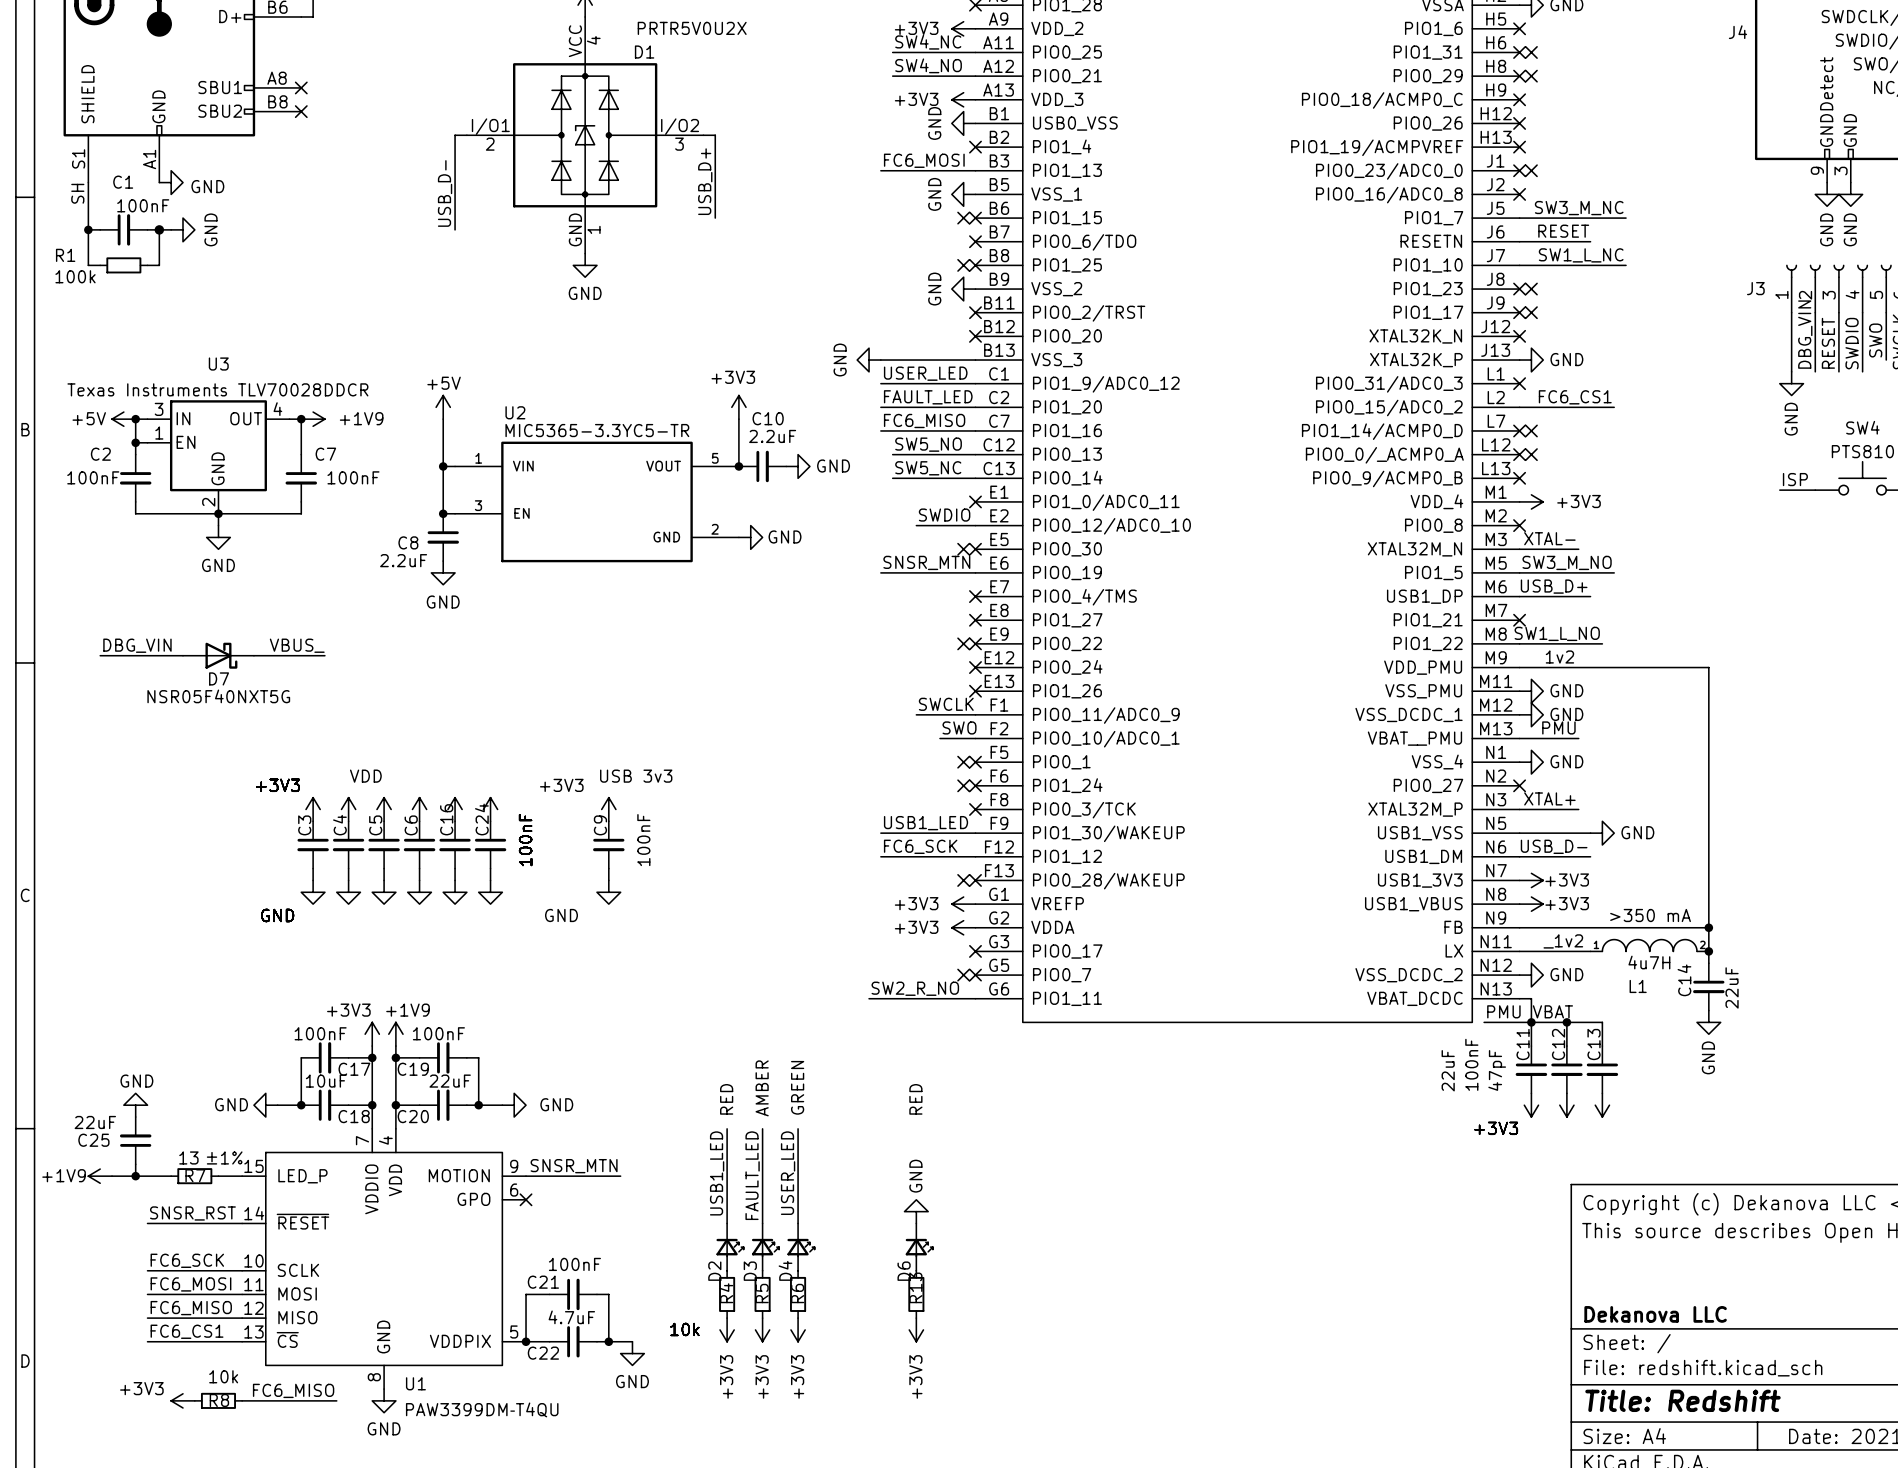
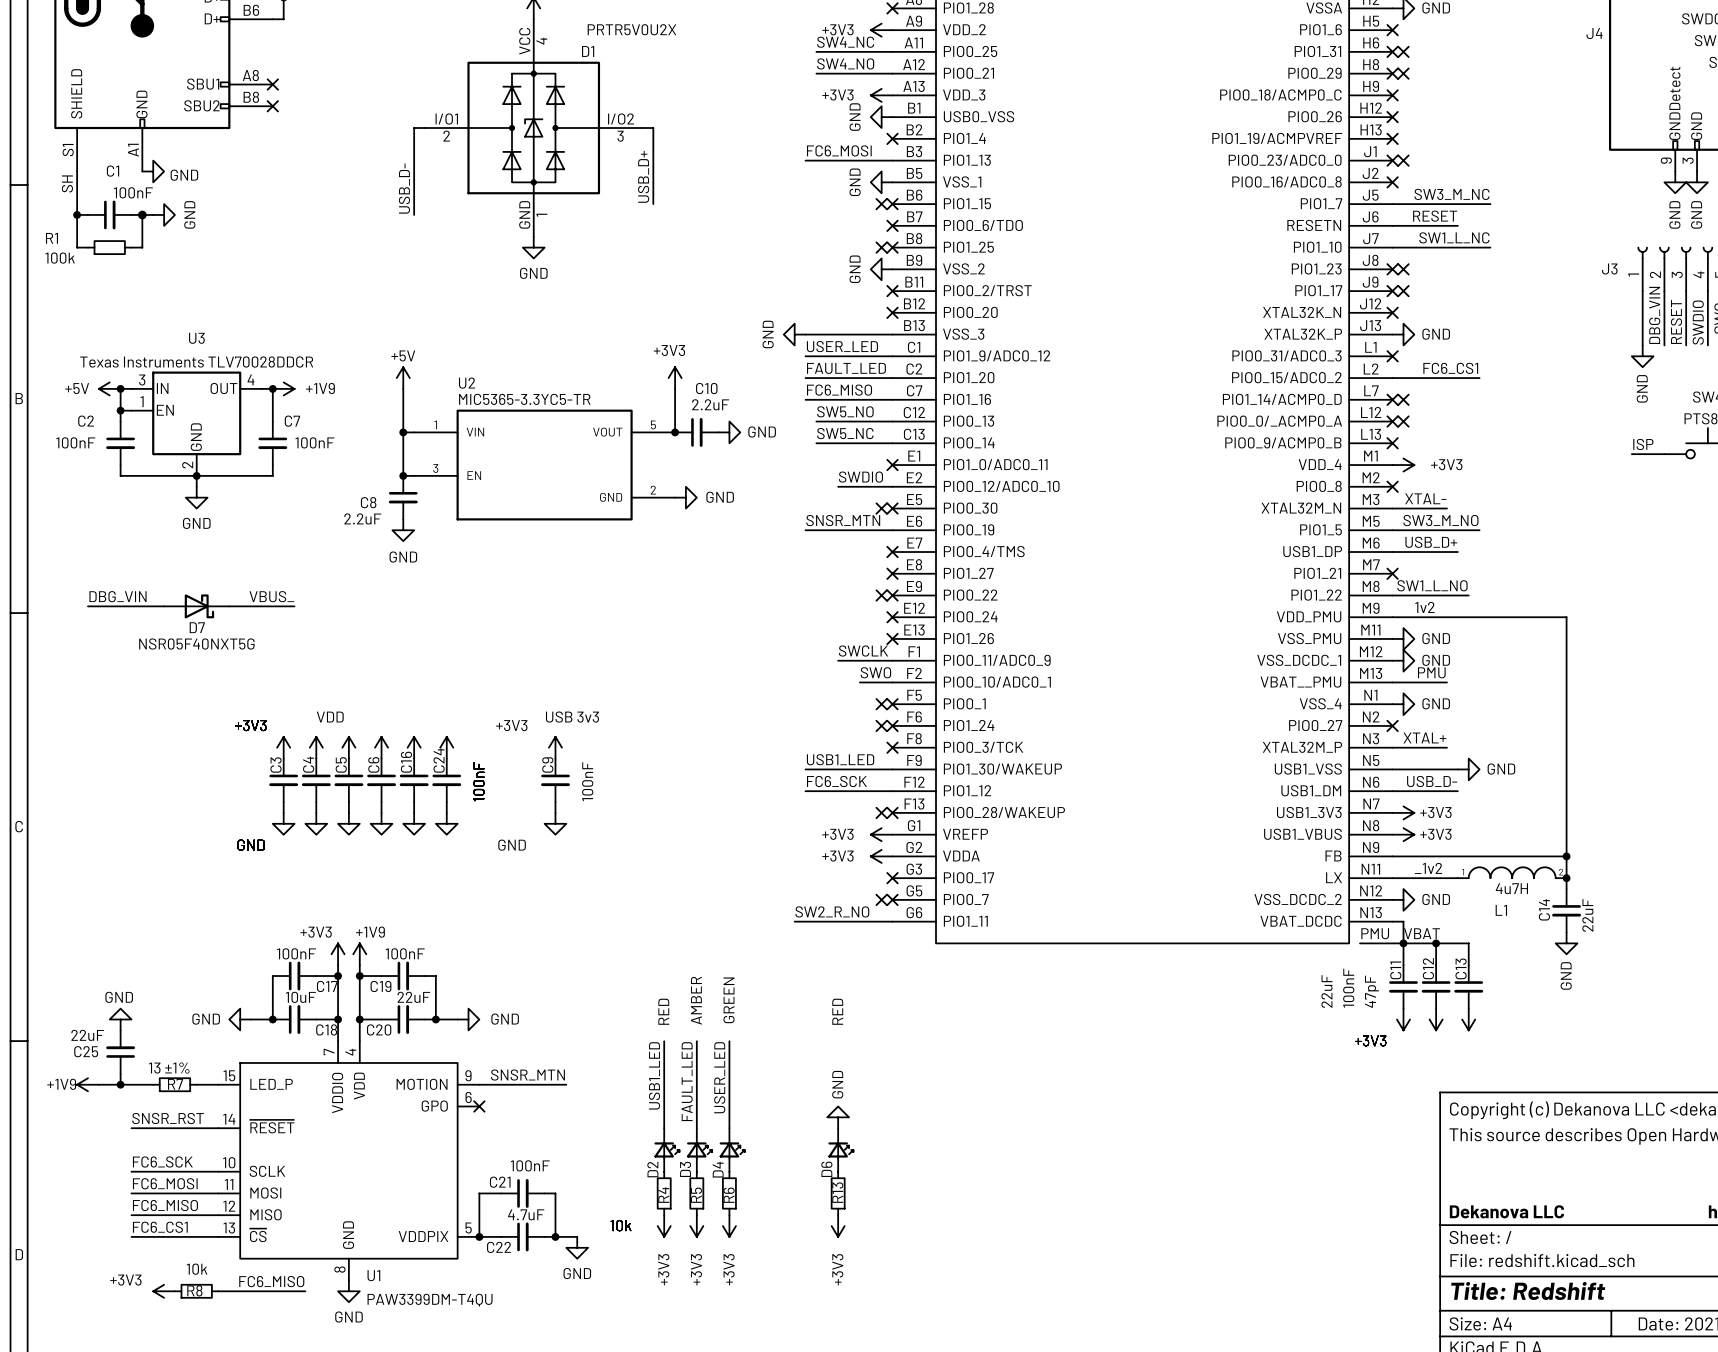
L1 text: >350 mA (1650, 915) -> none
R7 value: 13 (188, 1157) -> 13 ±1% (169, 1068)
R7 text: ±1% (224, 1157) -> none

